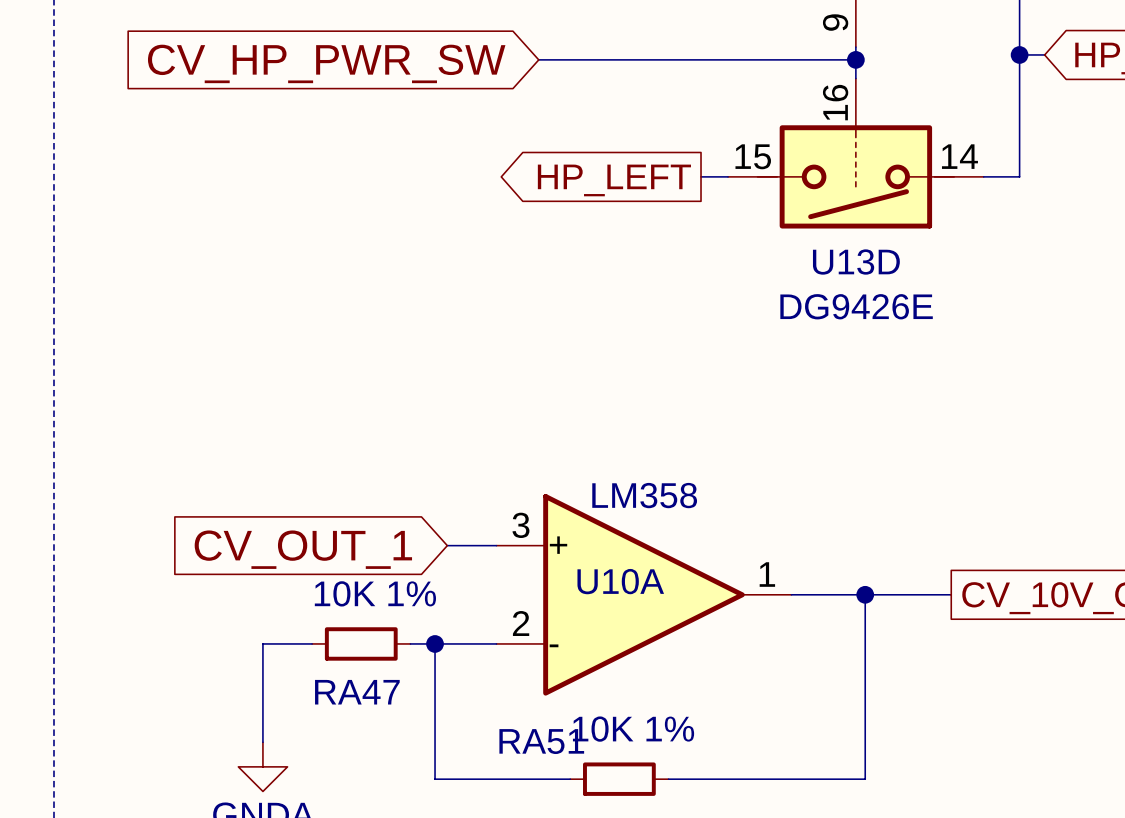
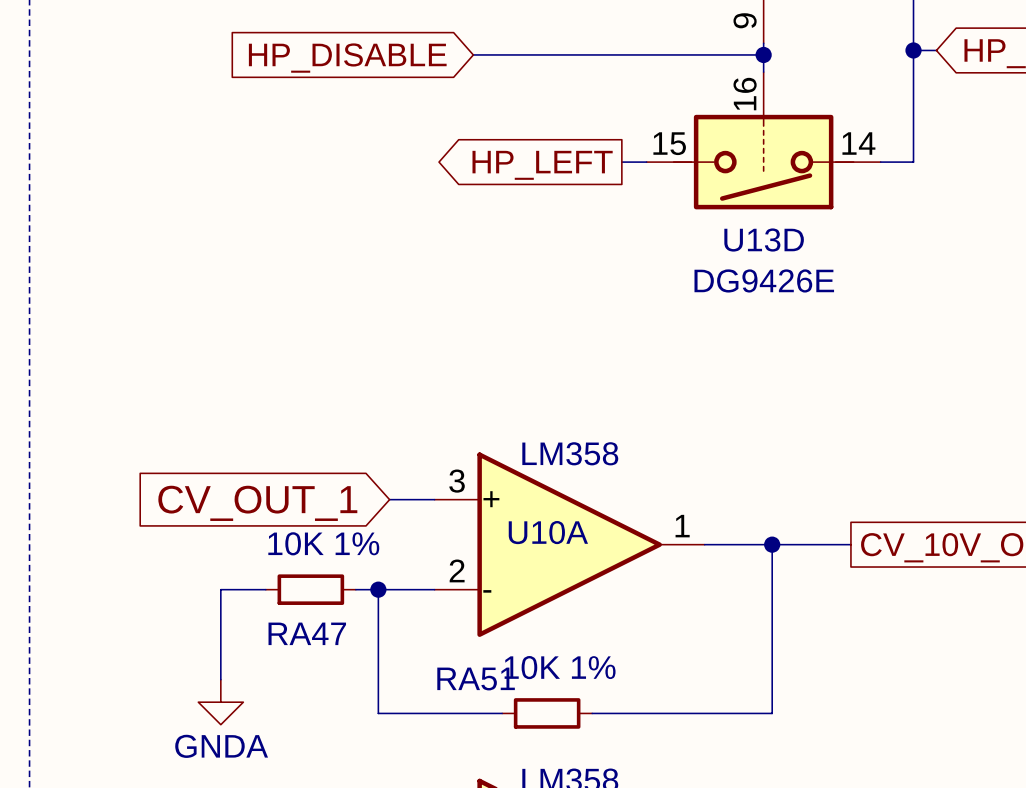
global label: CV_HP_PWR_SW (326, 63) -> HP_DISABLE (347, 58)

